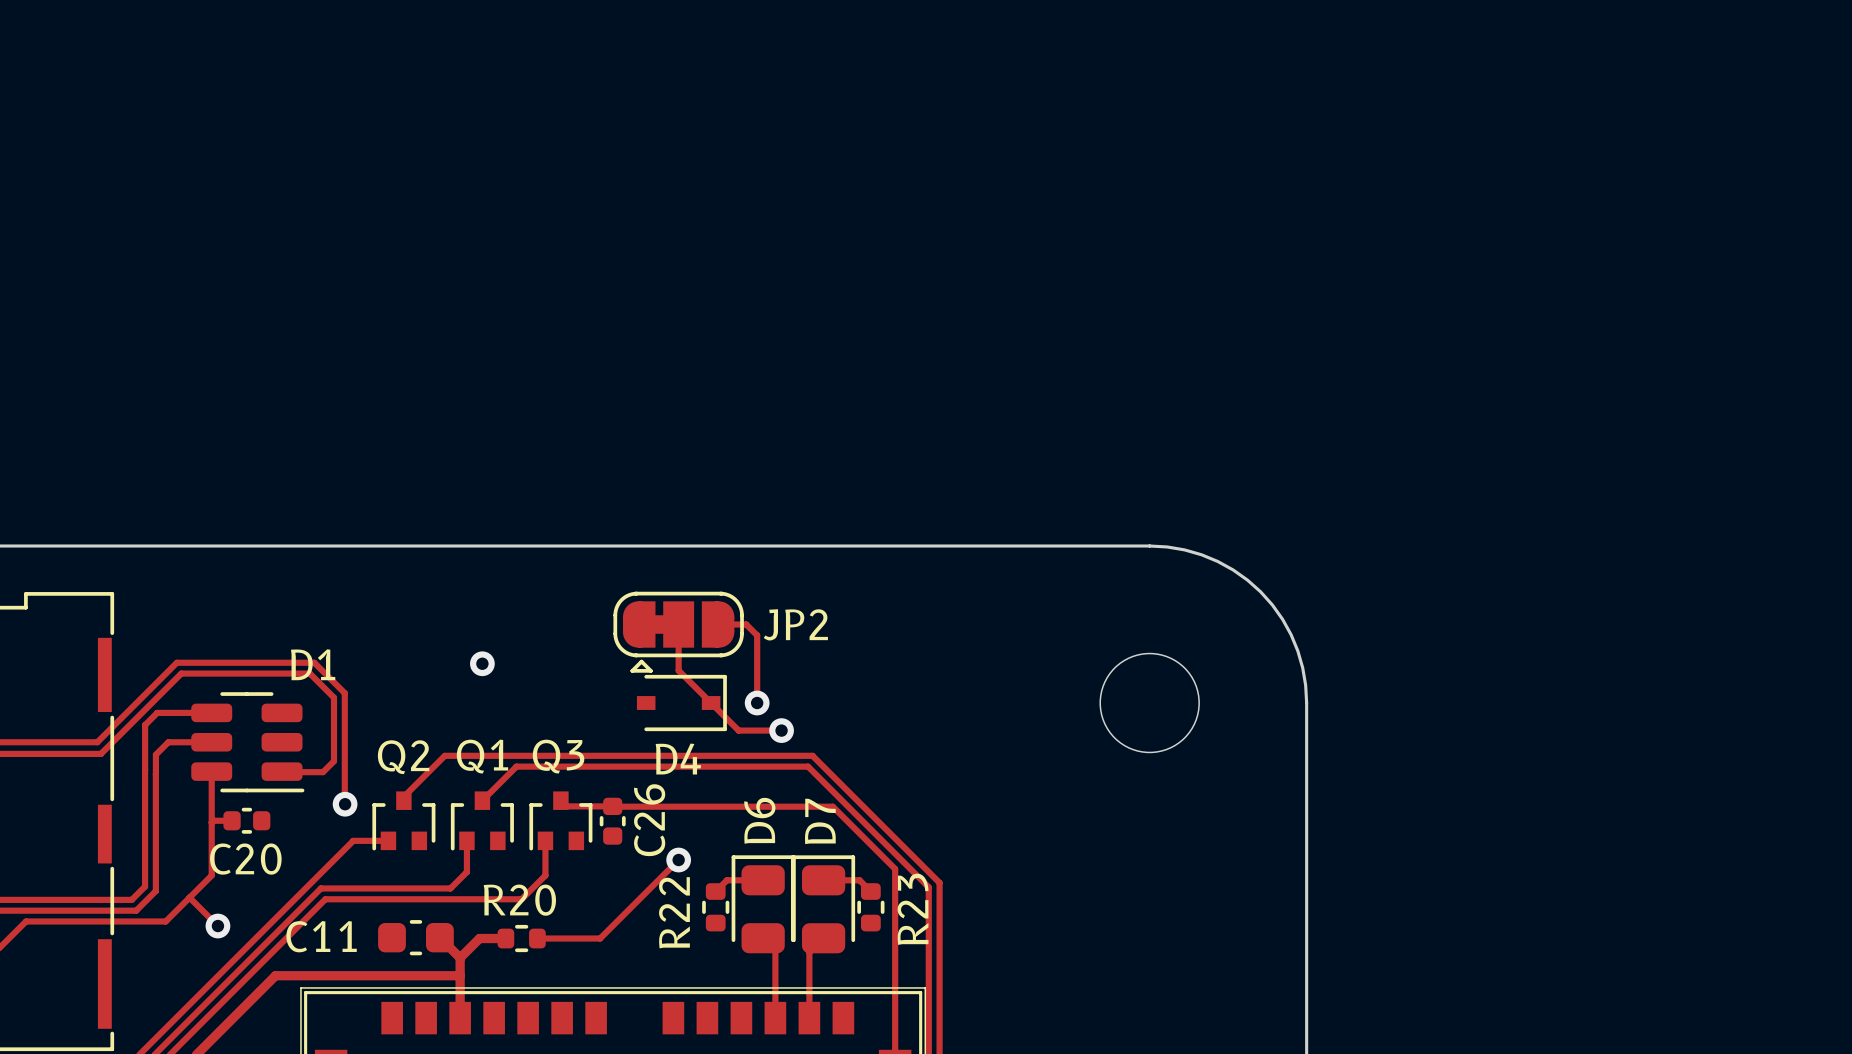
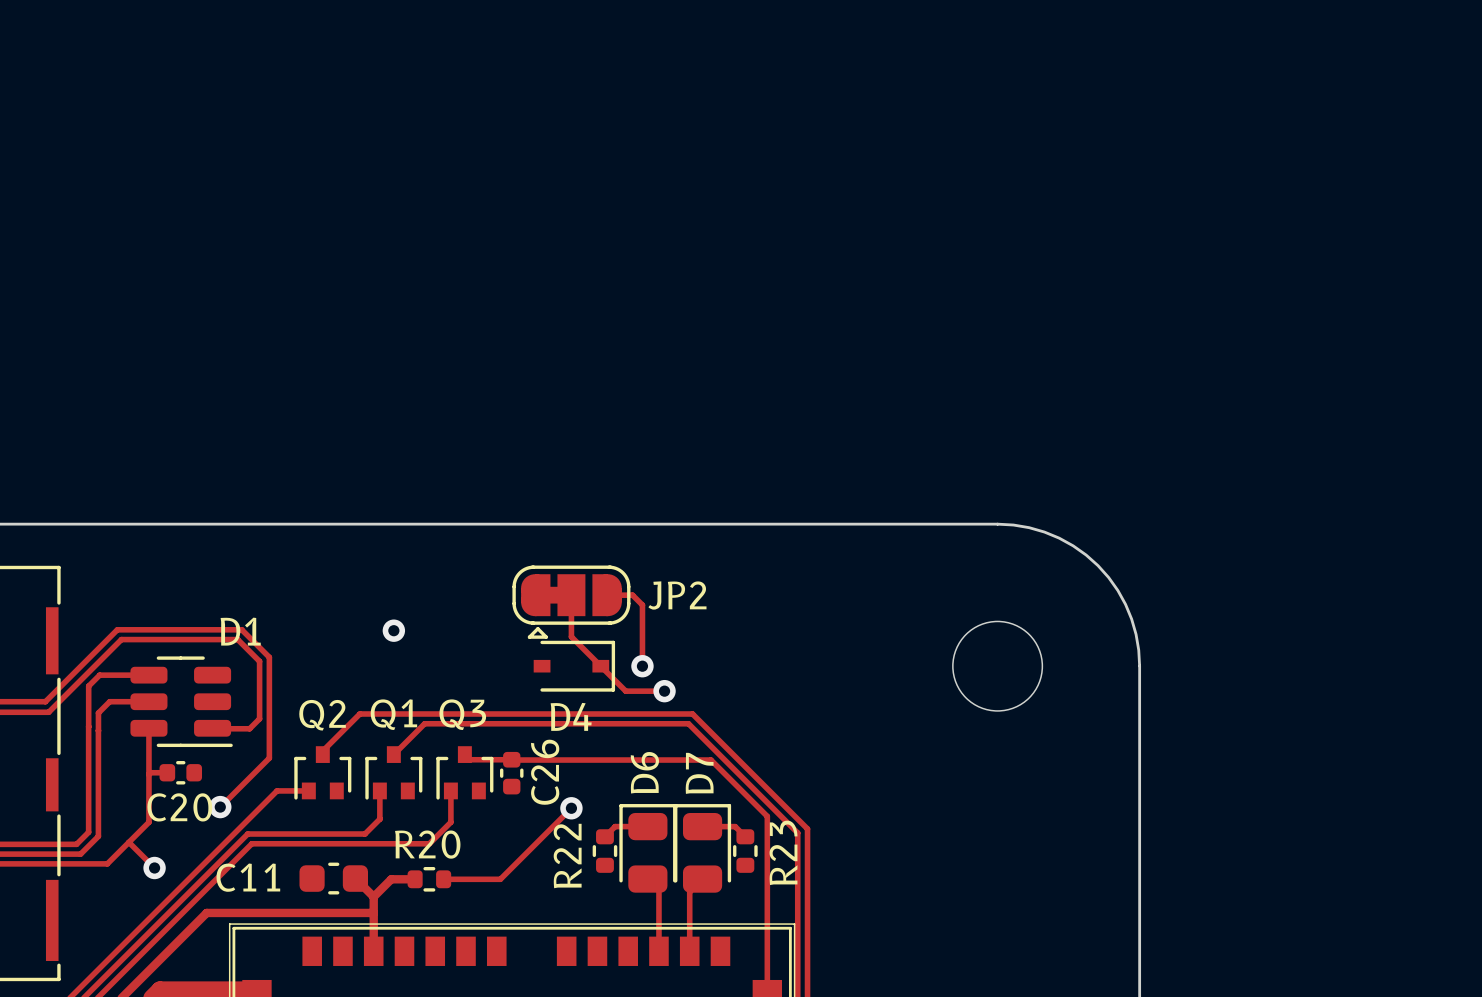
track: none -> (269, 757) (220, 807)
via position: (345, 804) -> (220, 807)

